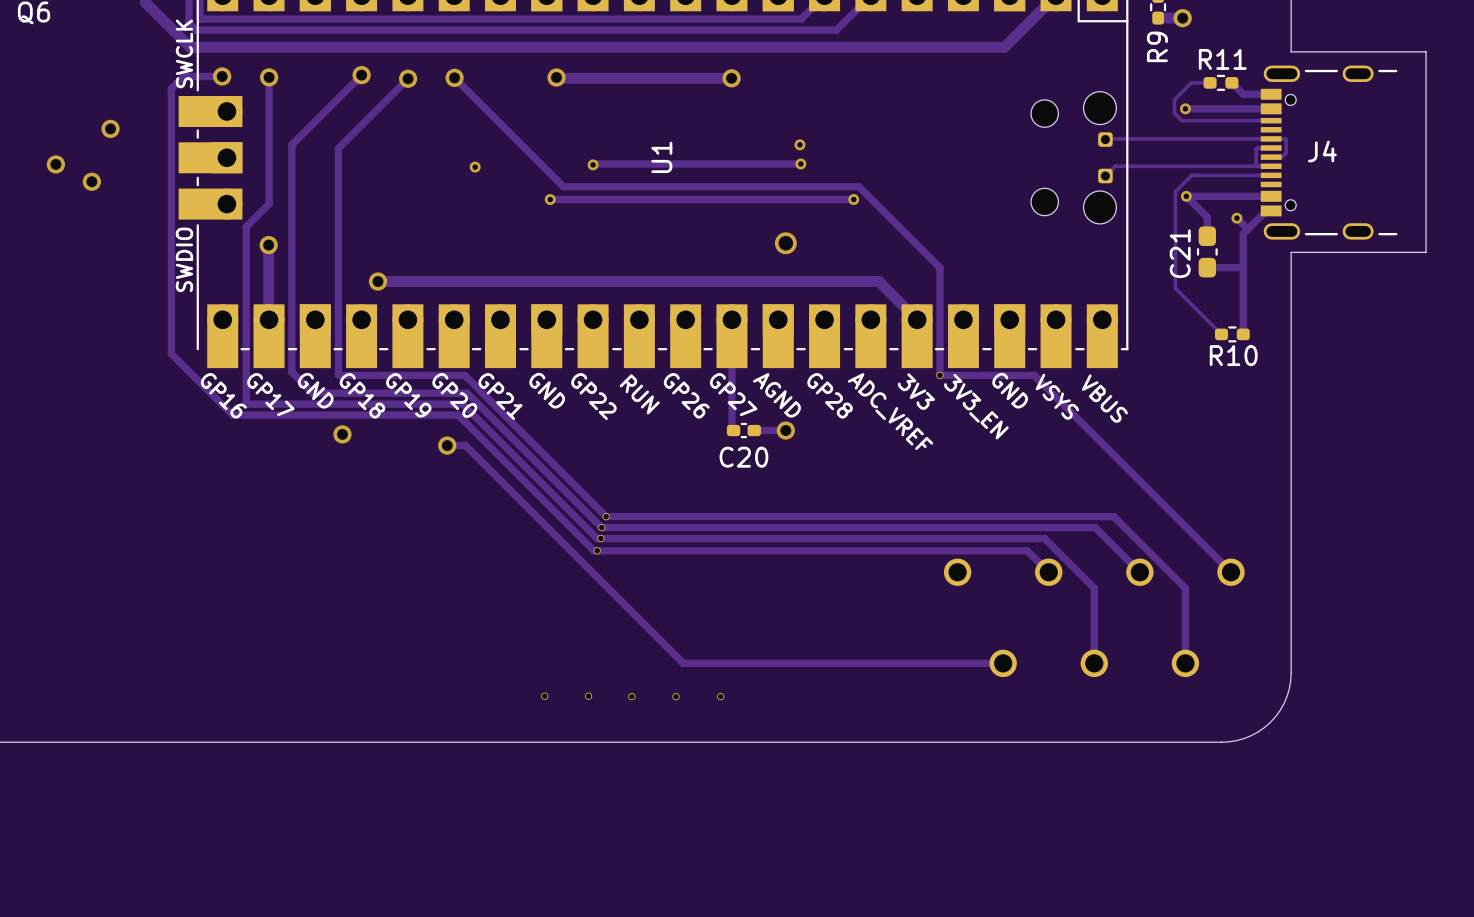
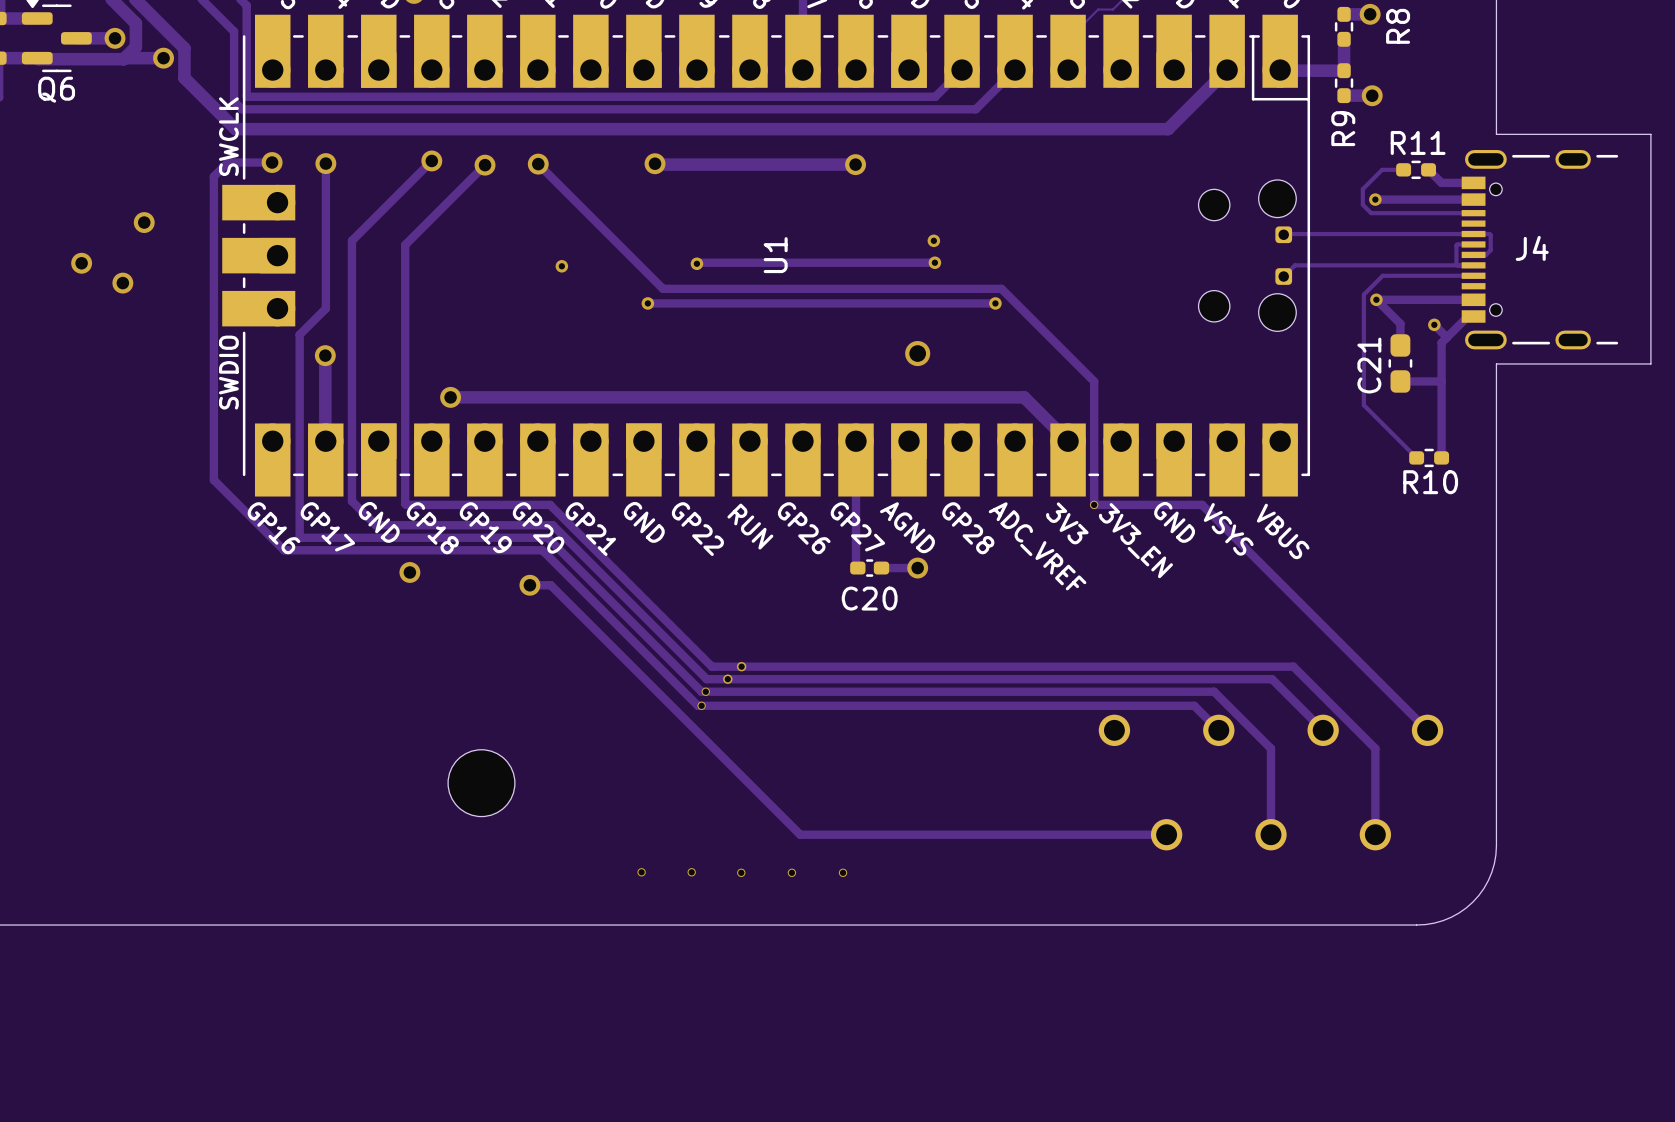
via: (606, 516) -> none
via: none -> (741, 666)
via: (601, 527) -> none
via: none -> (727, 679)
part: none -> (481, 783)

